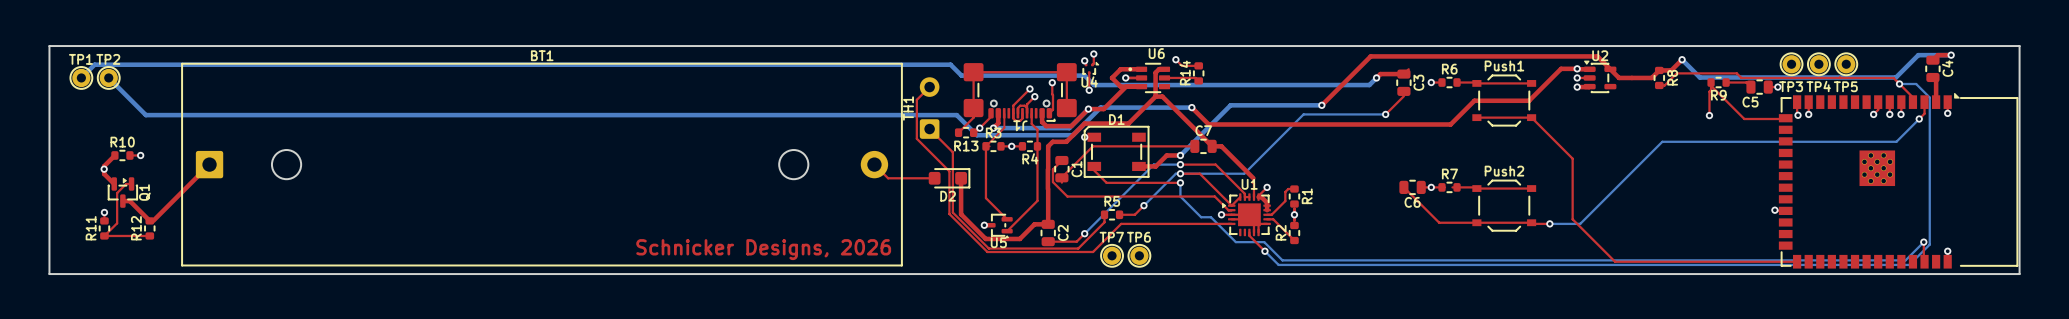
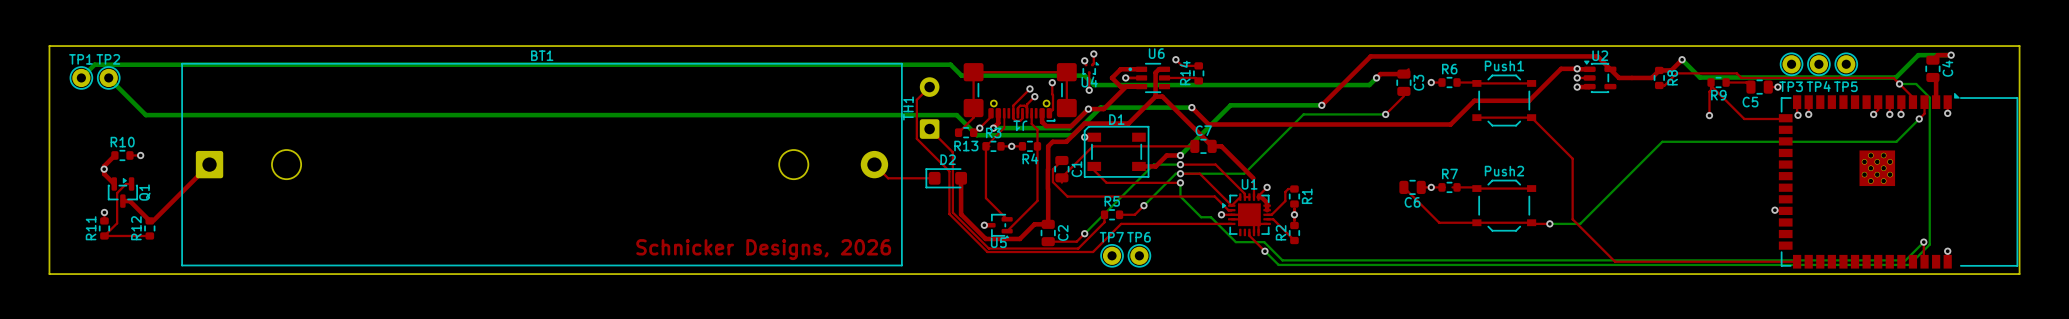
D2 rotation: 0° (949, 178) -> 180° (946, 178)

